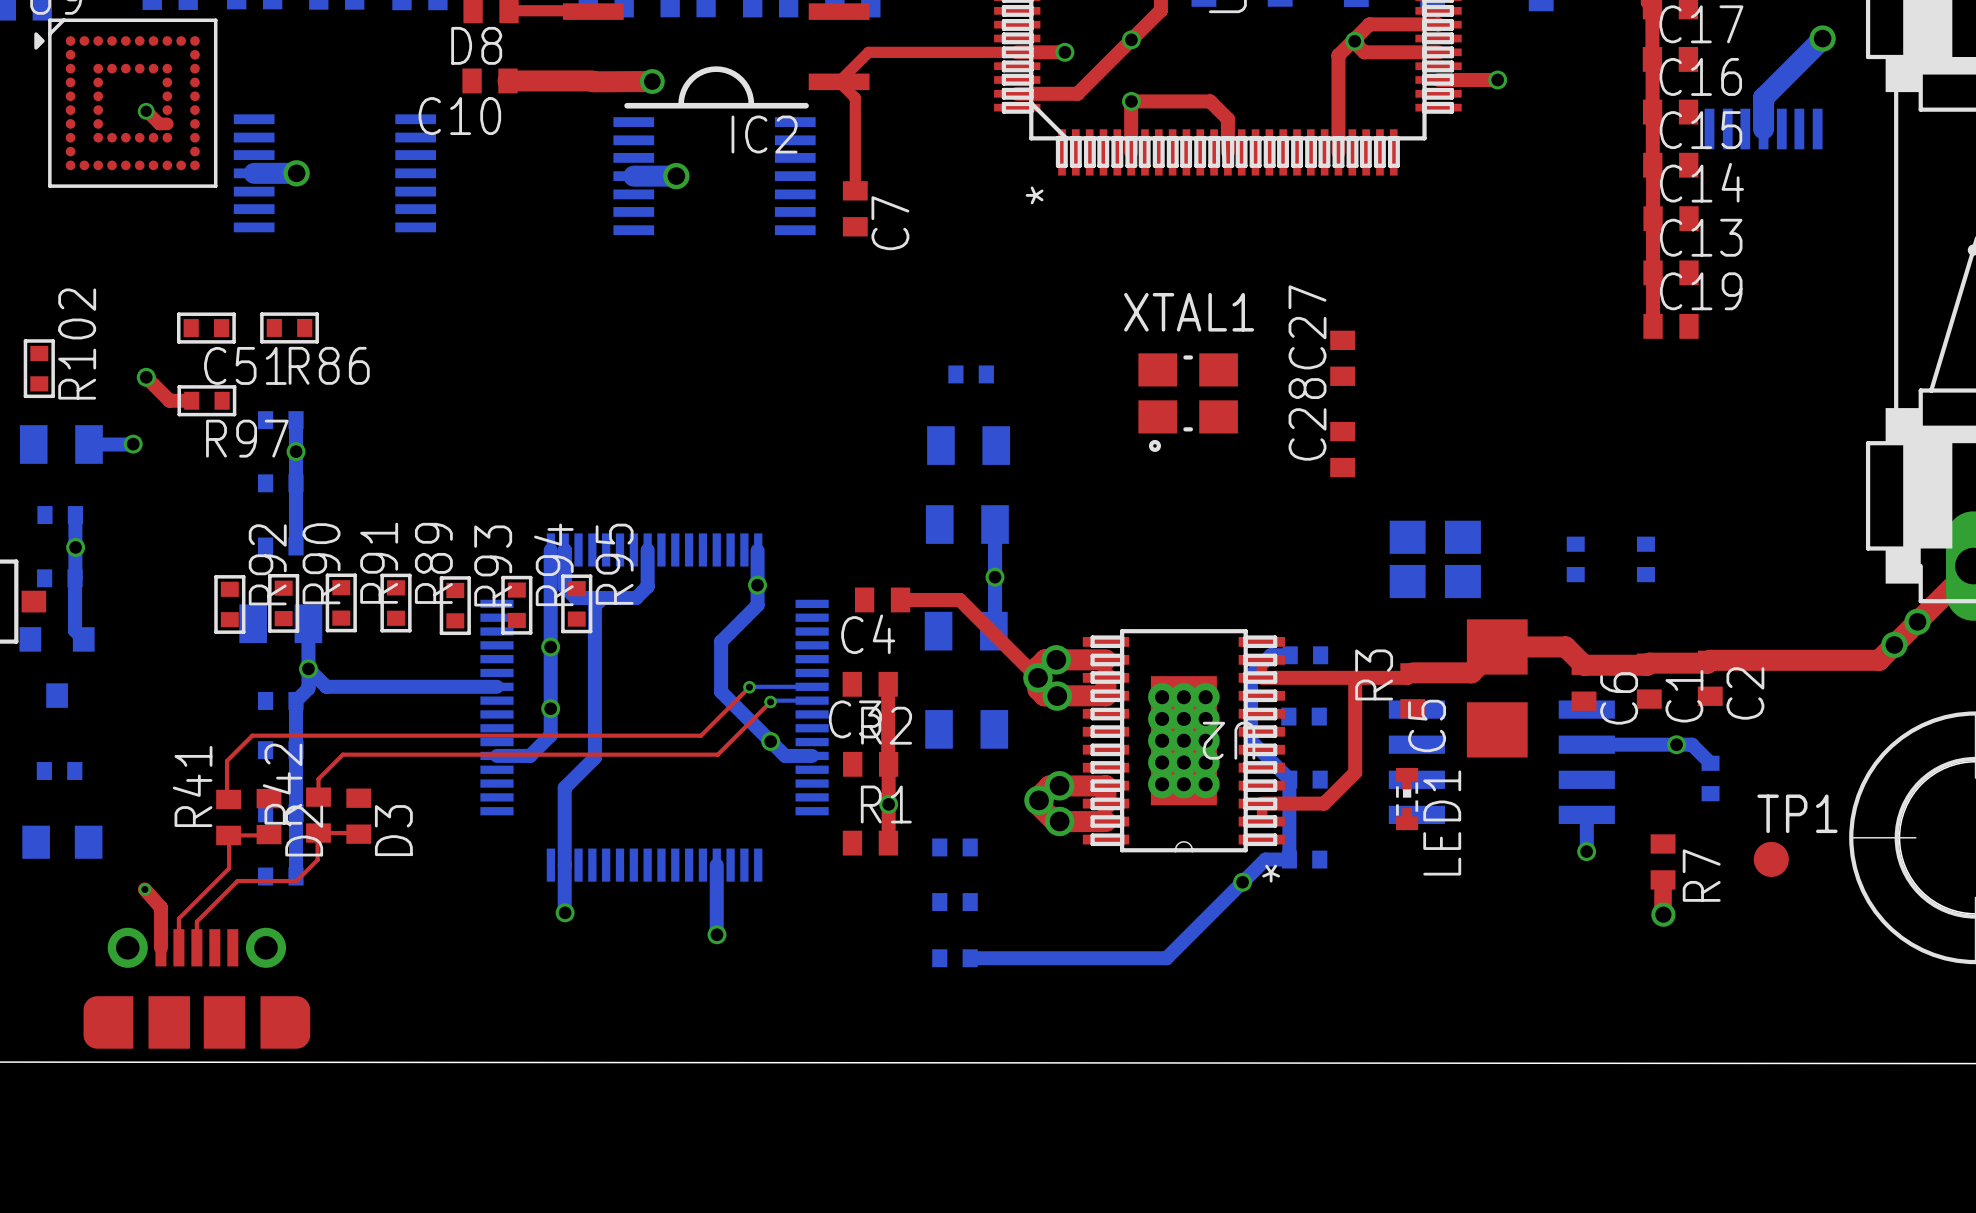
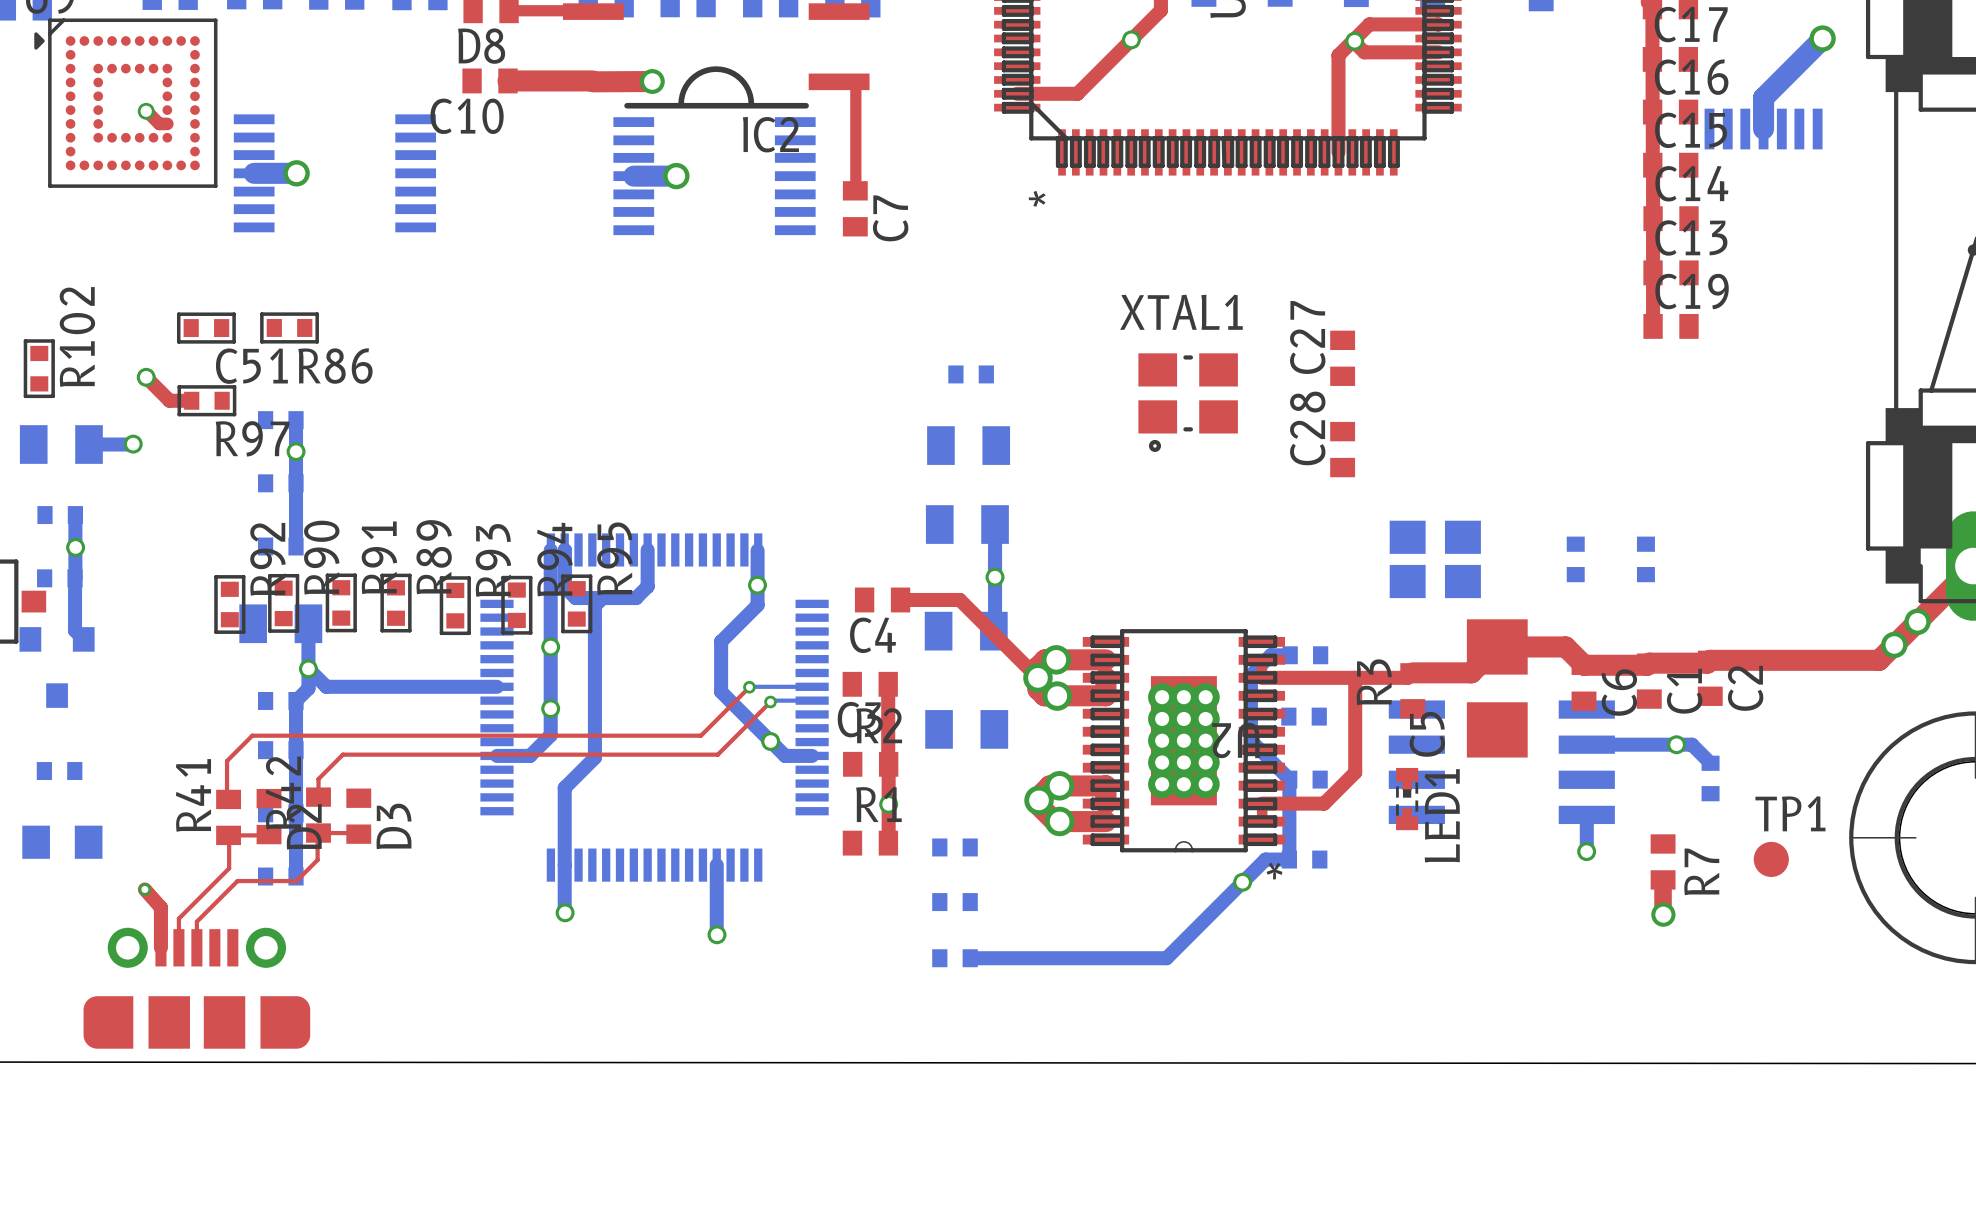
top track: (1064, 52) (868, 52) (839, 81) (855, 98) (855, 190) -> (855, 82) (855, 190)
via: (1064, 52) -> none
top track: (1438, 79) (1498, 79) -> none
via: (1497, 80) -> none
top track: (1131, 101) (1210, 101) (1227, 119) (1227, 152) -> none
top track: (1131, 101) (1131, 152) -> none
via: (1131, 101) -> none

